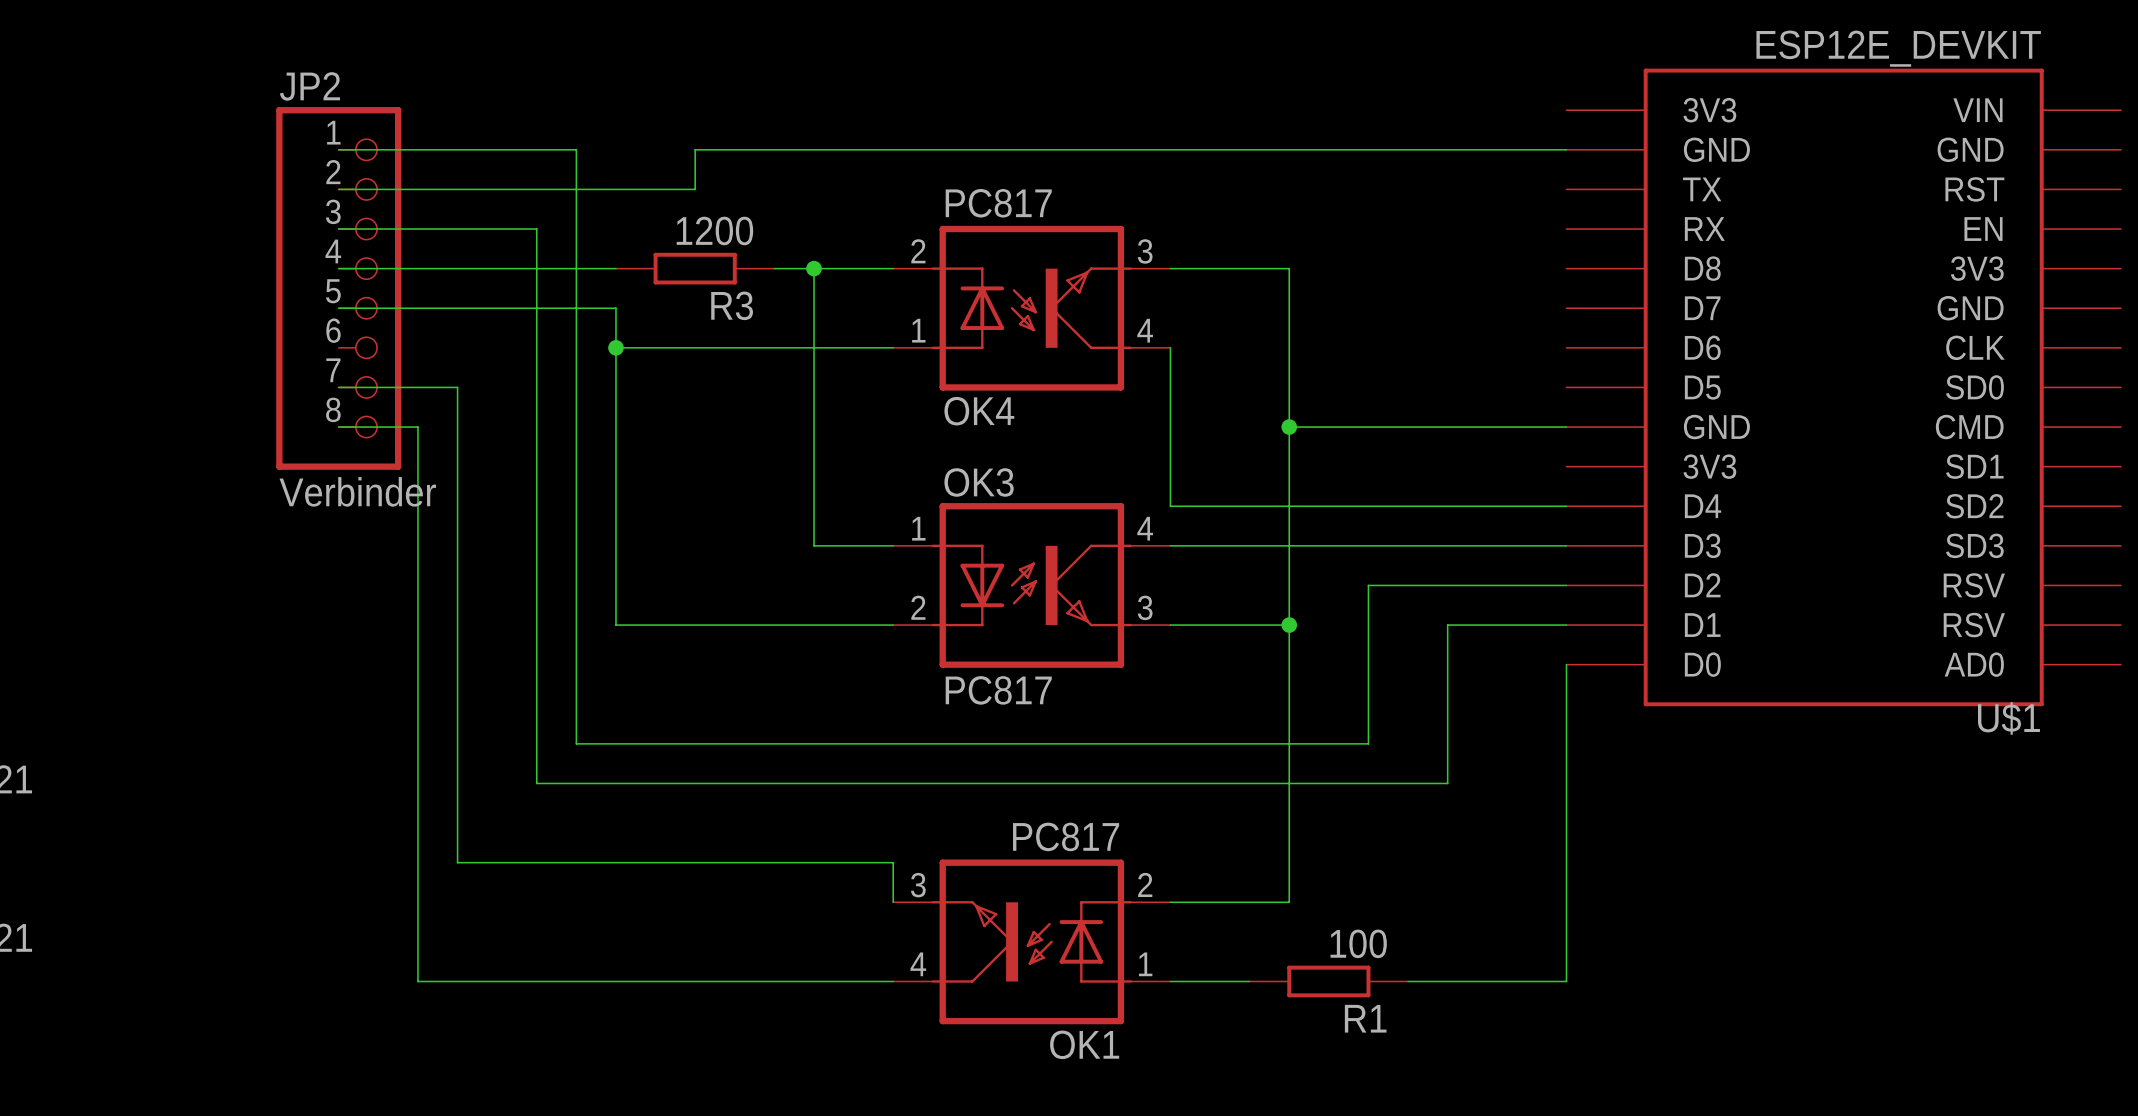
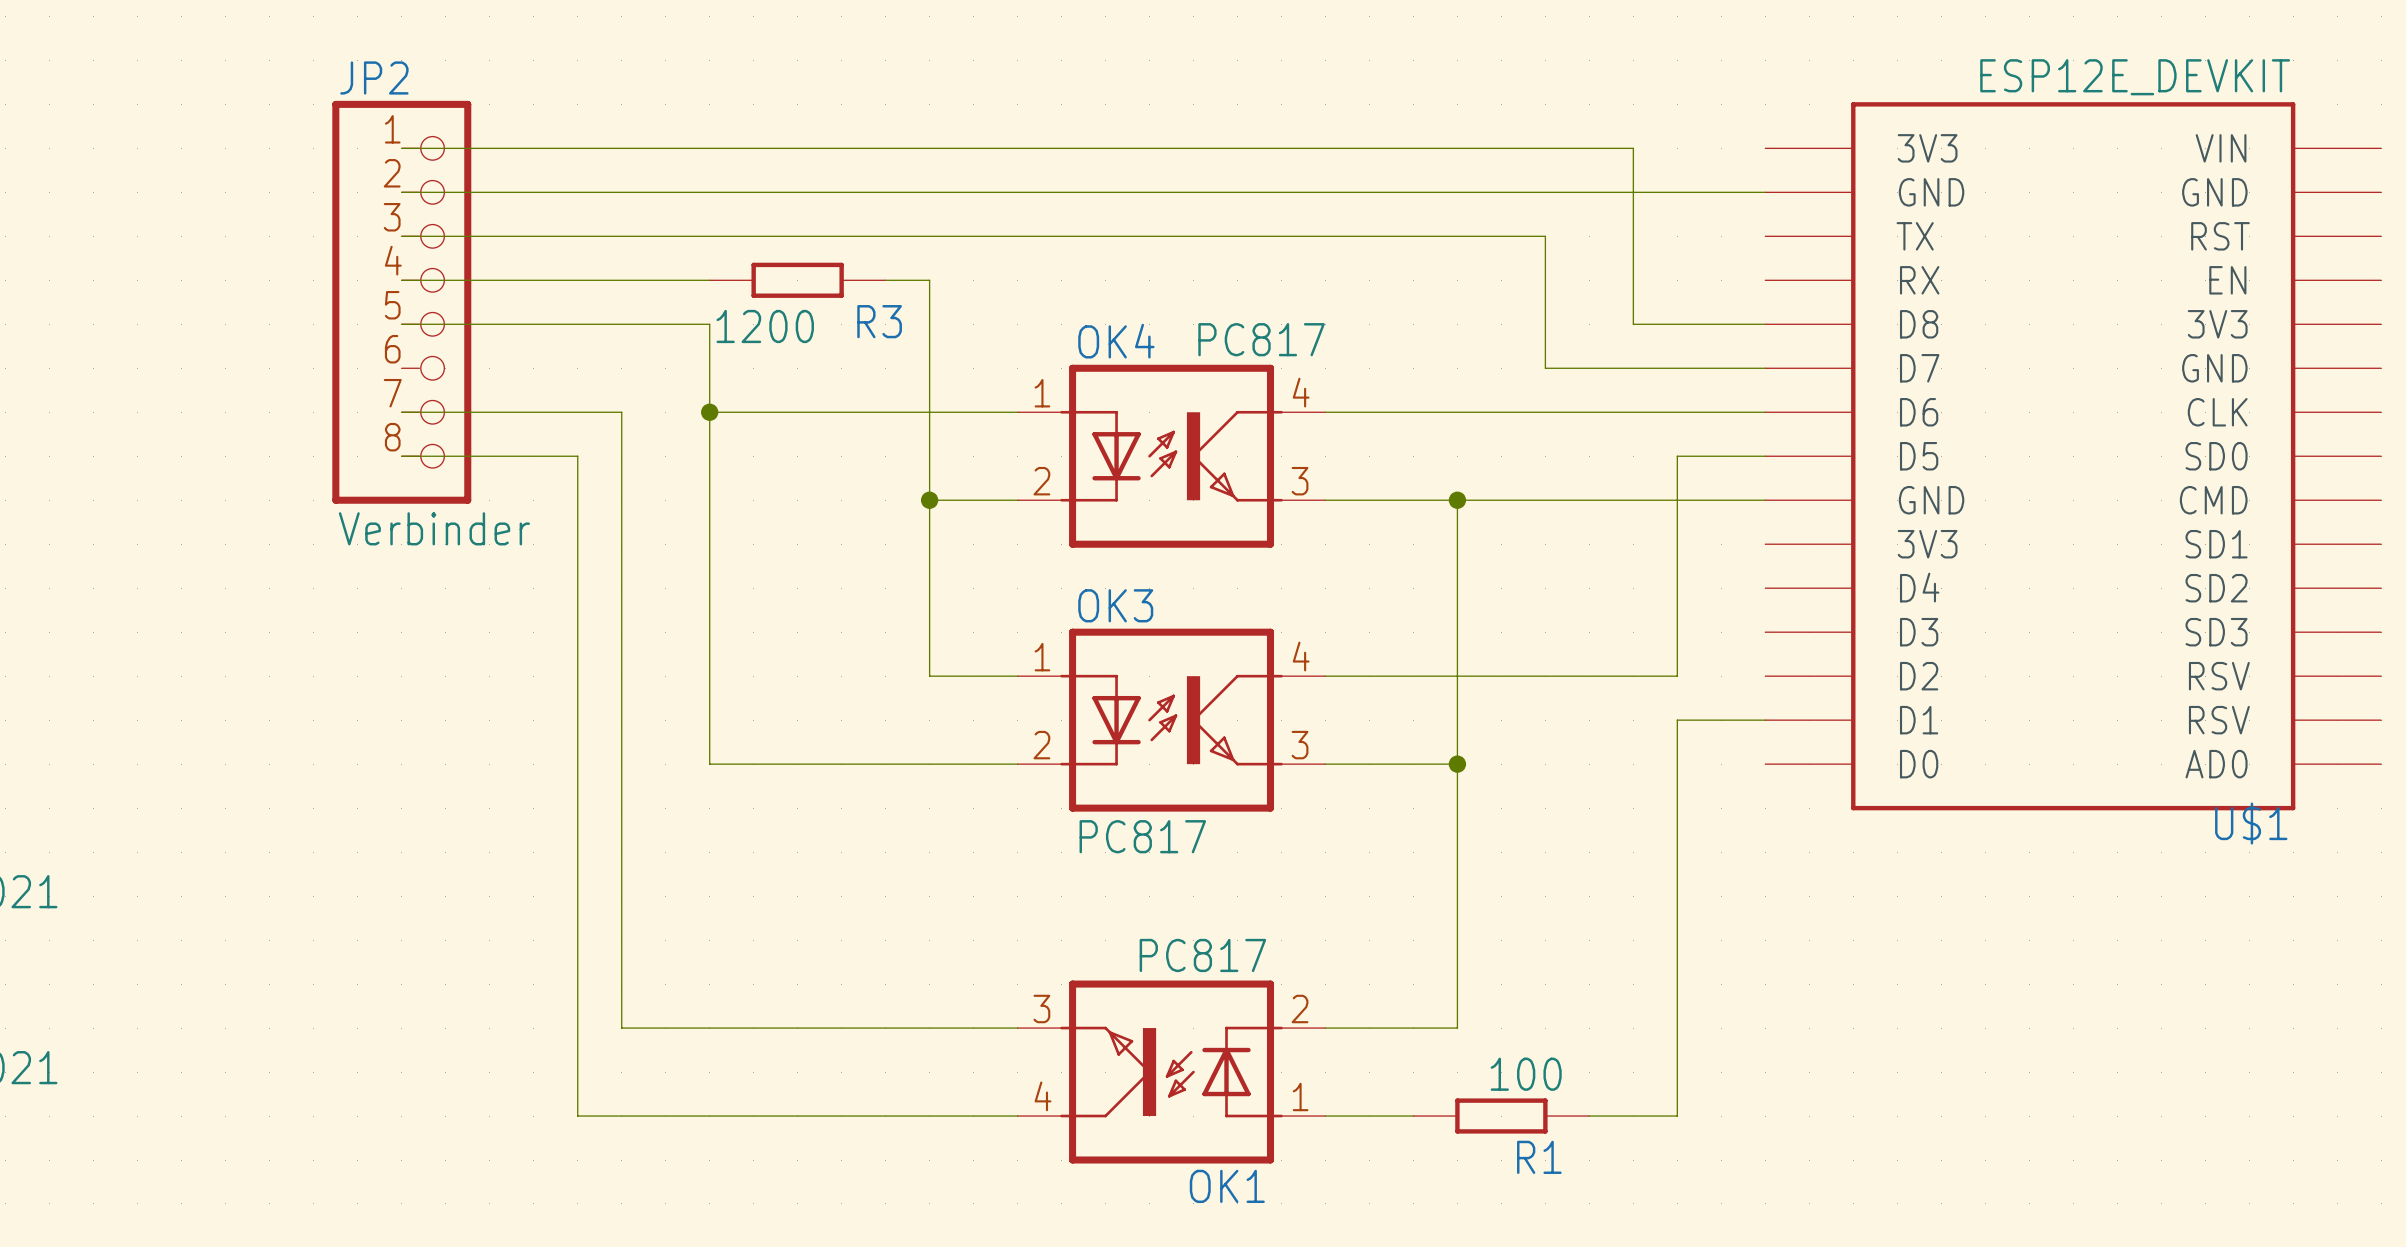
wire: none -> (401, 148) (1633, 148) (1633, 324) (1765, 324)
wire: (576, 149) (576, 743) (1368, 743) (1368, 585) -> (1325, 676) (1545, 676)
wire: (695, 149) (695, 189) -> (797, 192) (665, 192)
wire: none -> (797, 236) (1545, 236) (1545, 368) (1765, 368)
OK4 value position: PC817 (998, 203) -> PC817 (1261, 339)
wire: (536, 229) (536, 347) -> (621, 280) (709, 280)
wire: none -> (885, 280) (929, 280) (929, 324)
R3 value position: 1200 (714, 230) -> 1200 (765, 326)
R3 position: (695, 268) -> (797, 280)
wire: (774, 268) (893, 268) -> none
junction: (814, 268) -> none
wire: (1170, 268) (1289, 268) (1289, 427) -> (1325, 500) (1457, 500)
JP2 position: (338, 288) -> (401, 302)
R3 name position: R3 (732, 305) -> R3 (879, 321)
wire: (338, 308) (615, 308) -> (709, 324) (709, 368)
OK4 flip: as is (1031, 308) -> up-down (1171, 456)
wire: none -> (401, 412) (621, 412)
wire: (1170, 347) (1170, 506) (1566, 506) -> (1325, 412) (1765, 412)
wire: (457, 387) (457, 862) (893, 862) (893, 902) -> (621, 896) (621, 1028) (1017, 1028)
wire: (338, 427) (417, 427) (417, 981) (497, 981) -> (533, 456) (577, 456) (577, 1116)
wire: none -> (929, 500) (1017, 500)
junction: none -> (929, 500)
wire: (814, 545) (893, 545) -> (929, 632) (929, 676) (1017, 676)
wire: (1170, 545) (1566, 545) -> none
OK3 position: (1031, 585) -> (1171, 720)
wire: (1487, 585) (1566, 585) -> (1677, 676) (1677, 456) (1765, 456)
wire: (615, 625) (893, 625) -> (709, 720) (709, 764) (1017, 764)
wire: (1170, 625) (1289, 625) -> (1325, 764) (1457, 764)
junction position: (1289, 625) -> (1457, 764)
wire: (1487, 625) (1447, 625) (1447, 783) (536, 783) -> none
wire: (1566, 664) (1566, 981) (1487, 981) -> (1677, 720) (1677, 1116)

